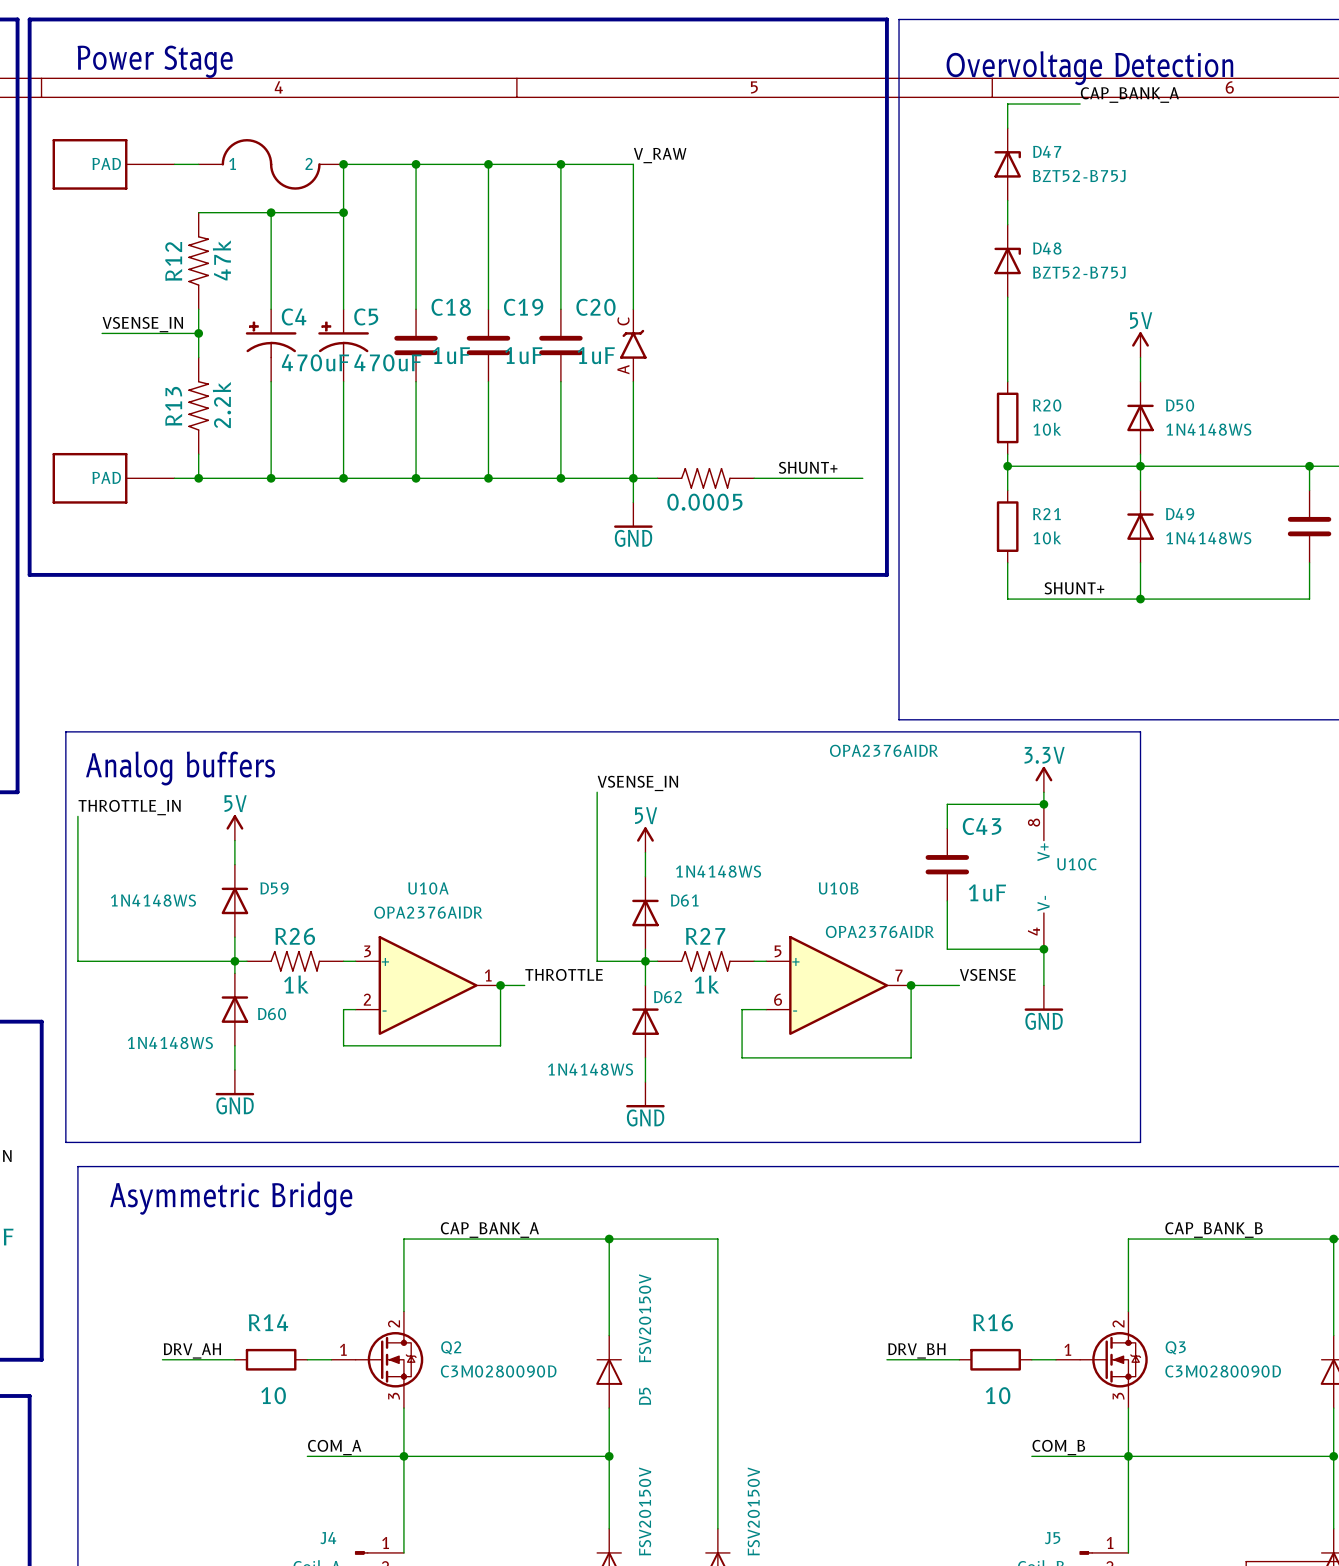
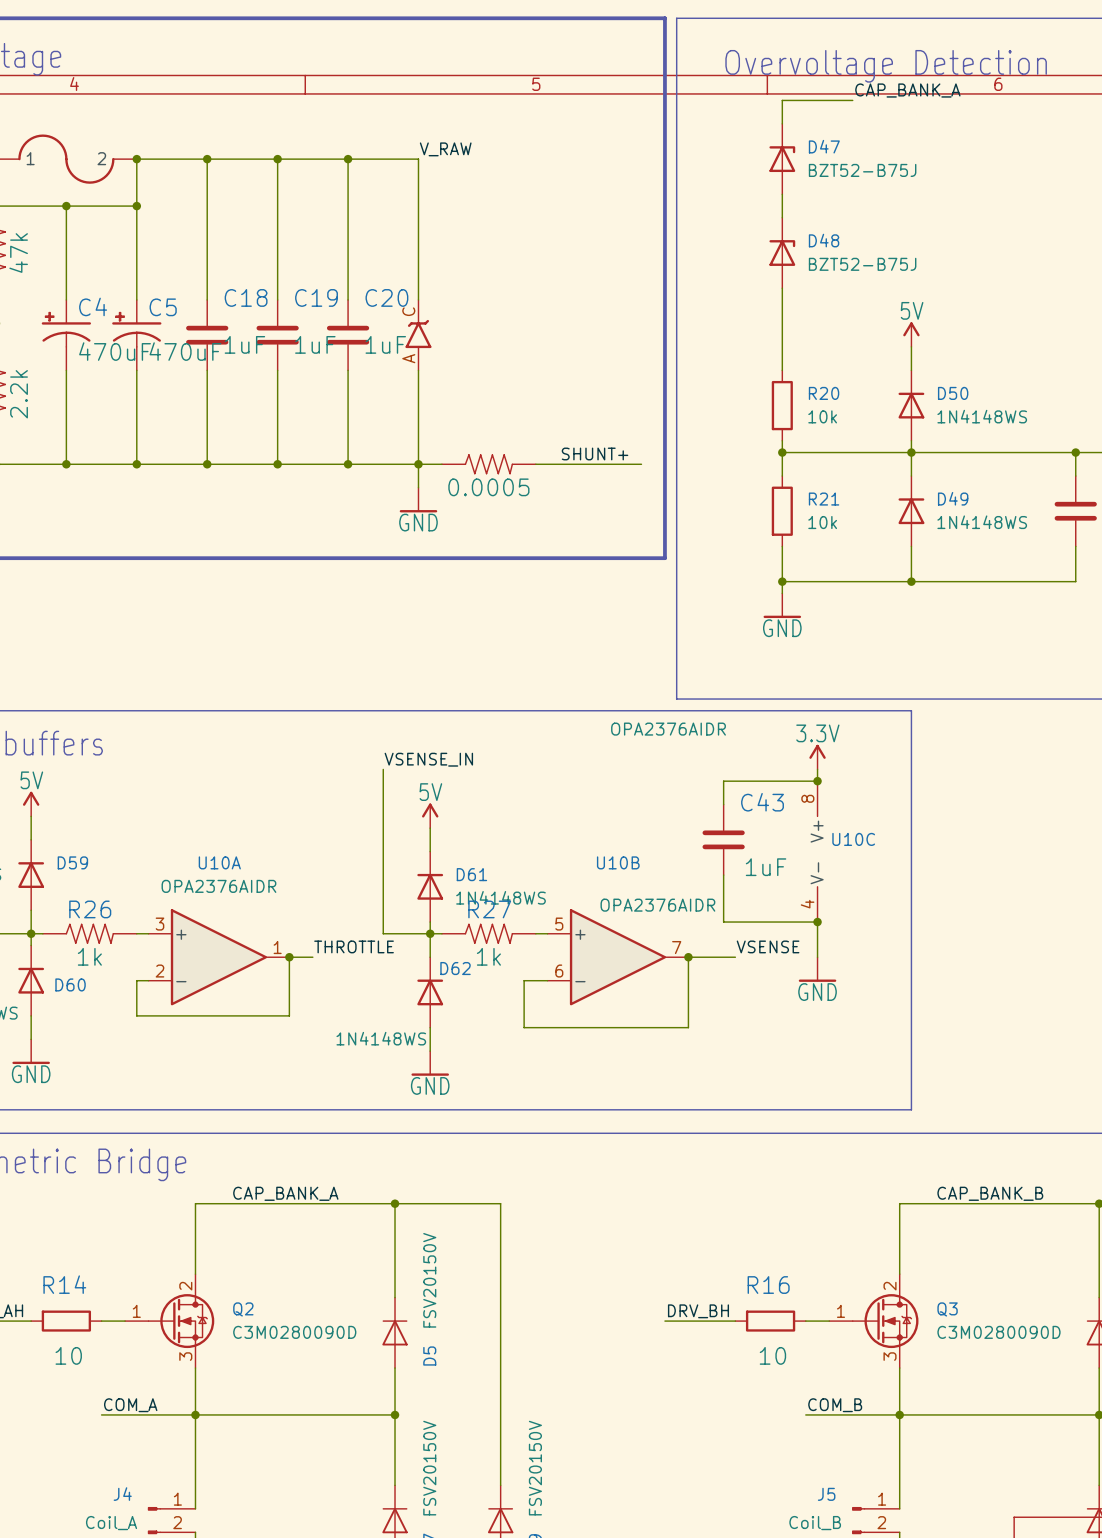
label: SHUNT+ (1074, 588) -> none
wire: none -> (782, 581) (782, 593)
junction: none -> (782, 581)
power symbol: none -> GND (782, 605)
D61 value position: 1N4148WS (718, 871) -> 1N4148WS (501, 897)

